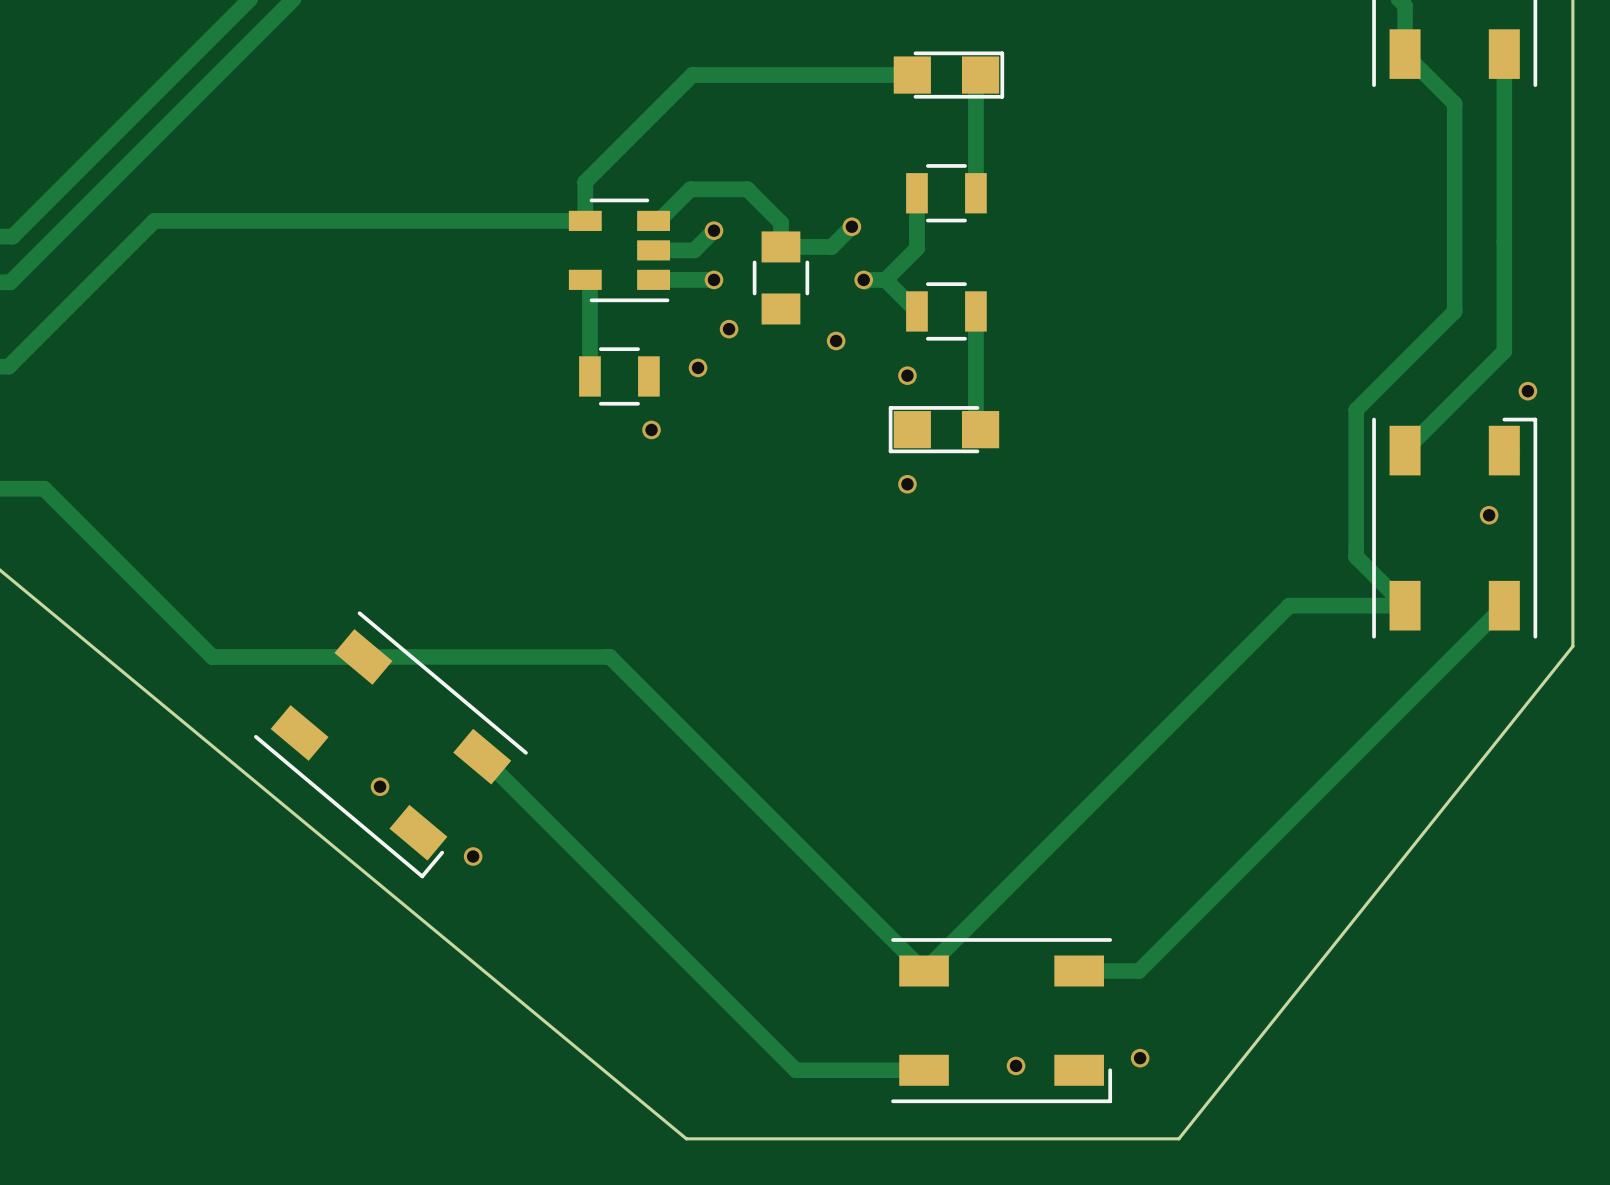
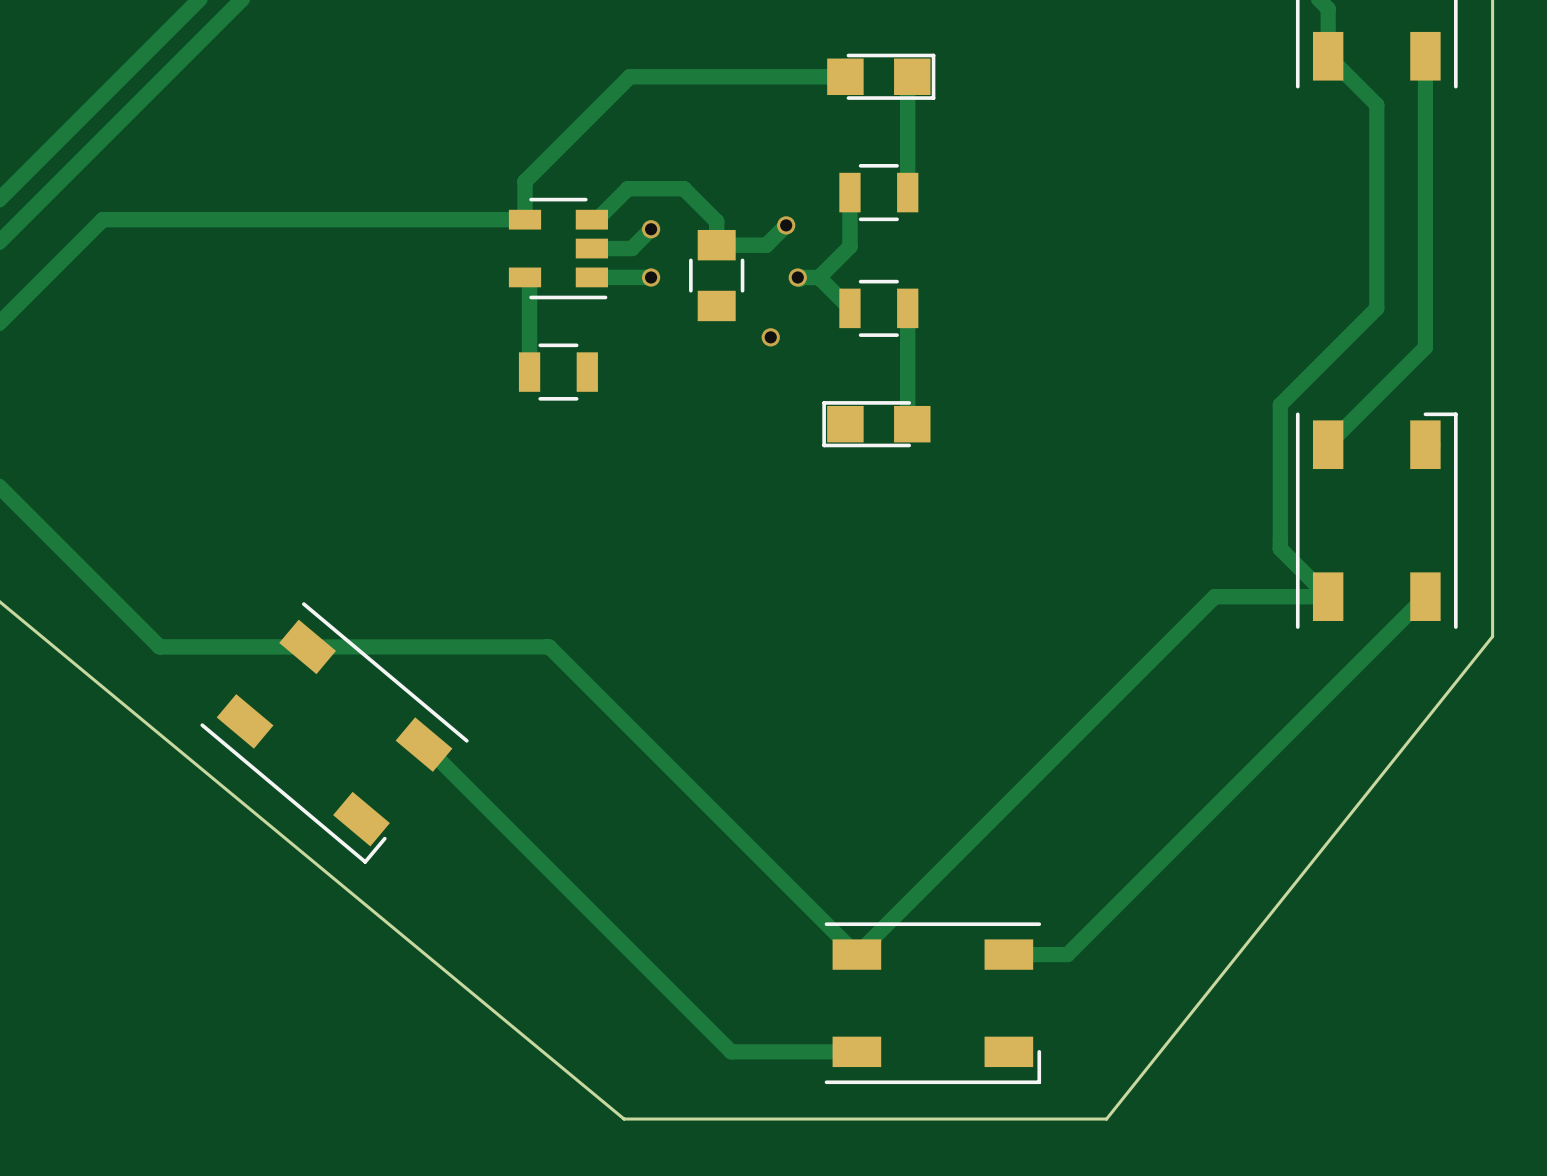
via: (729, 329) -> none
via: (698, 367) -> none
via: (907, 375) -> none
via: (1527, 391) -> none
via: (651, 429) -> none
via: (907, 484) -> none
via: (1489, 515) -> none
via: (380, 786) -> none
via: (473, 856) -> none
via: (1140, 1058) -> none
via: (1016, 1065) -> none

